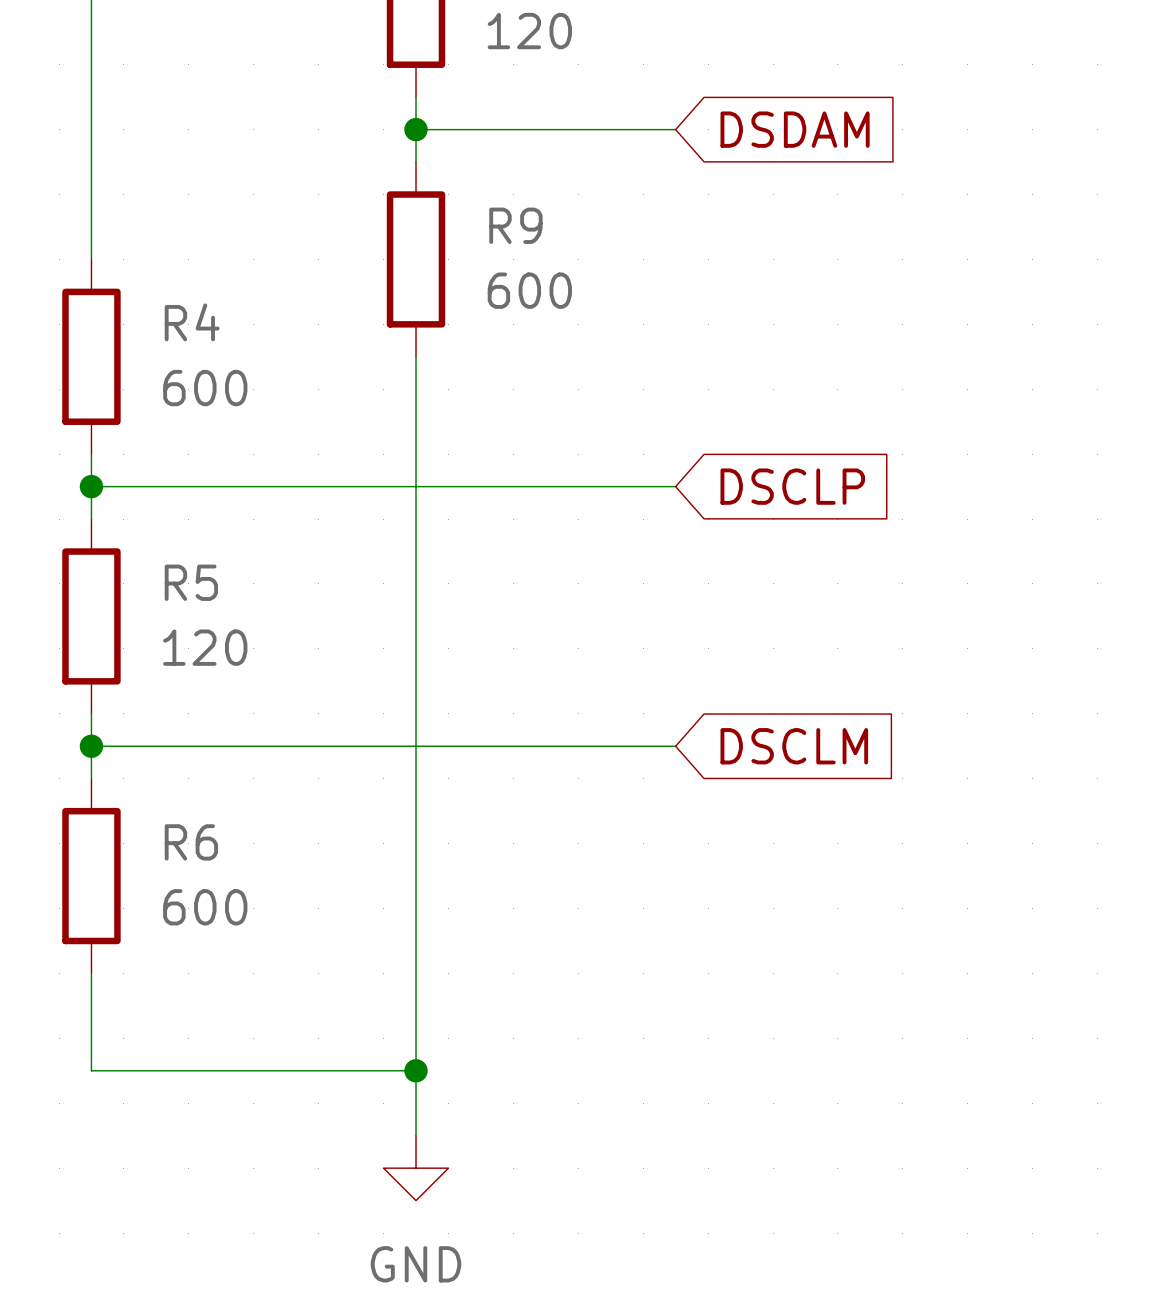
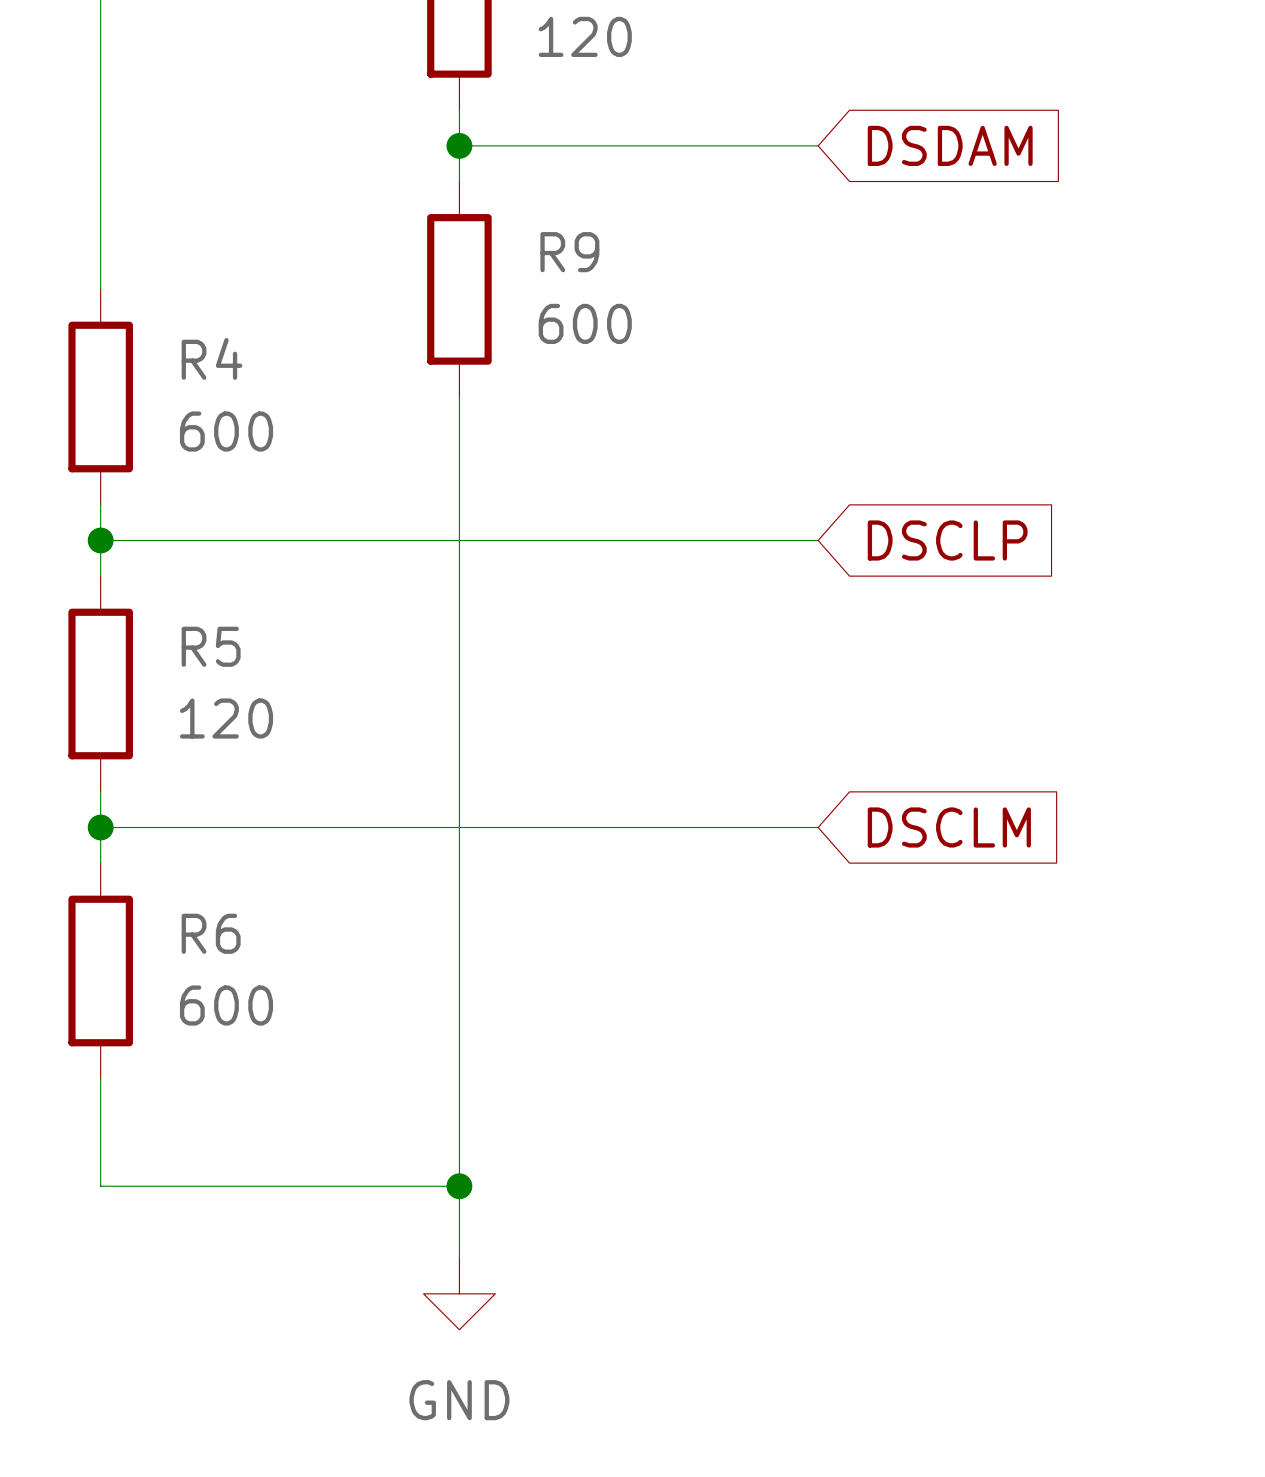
wire: none -> (746, 145) (818, 145)
global label position: DSDAM (795, 129) -> DSDAM (950, 145)
wire: none -> (746, 540) (818, 540)
global label position: DSCLP (792, 486) -> DSCLP (947, 540)
wire: none -> (746, 827) (818, 827)
global label position: DSCLM (794, 746) -> DSCLM (949, 827)

